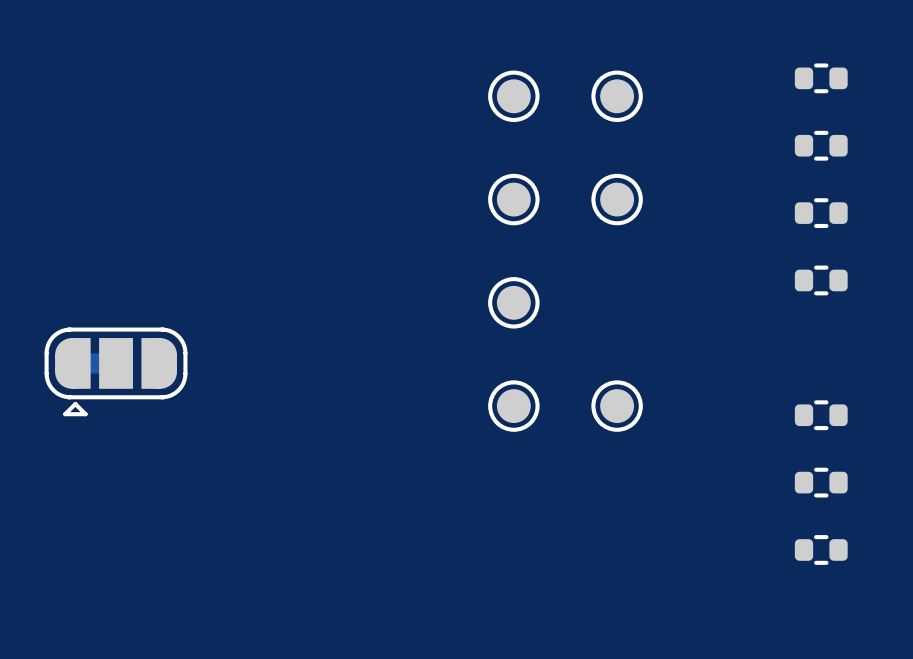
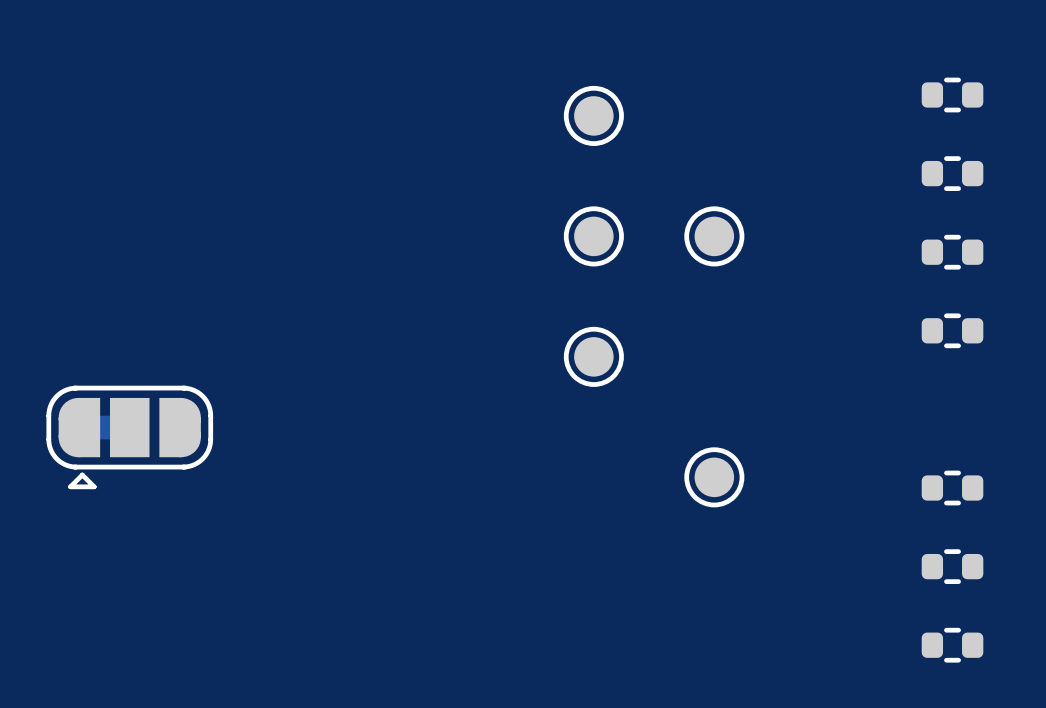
part: (617, 96) -> none
part: (513, 406) -> none

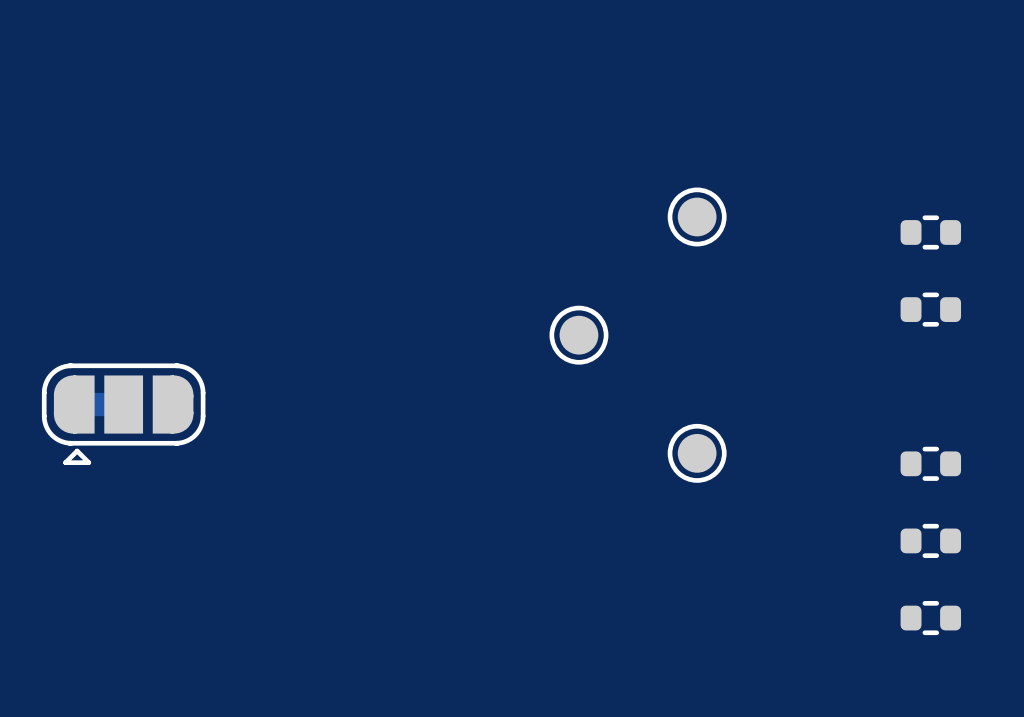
part: (952, 95) -> none
part: (593, 115) -> none
part: (952, 173) -> none
part: (593, 236) -> none

